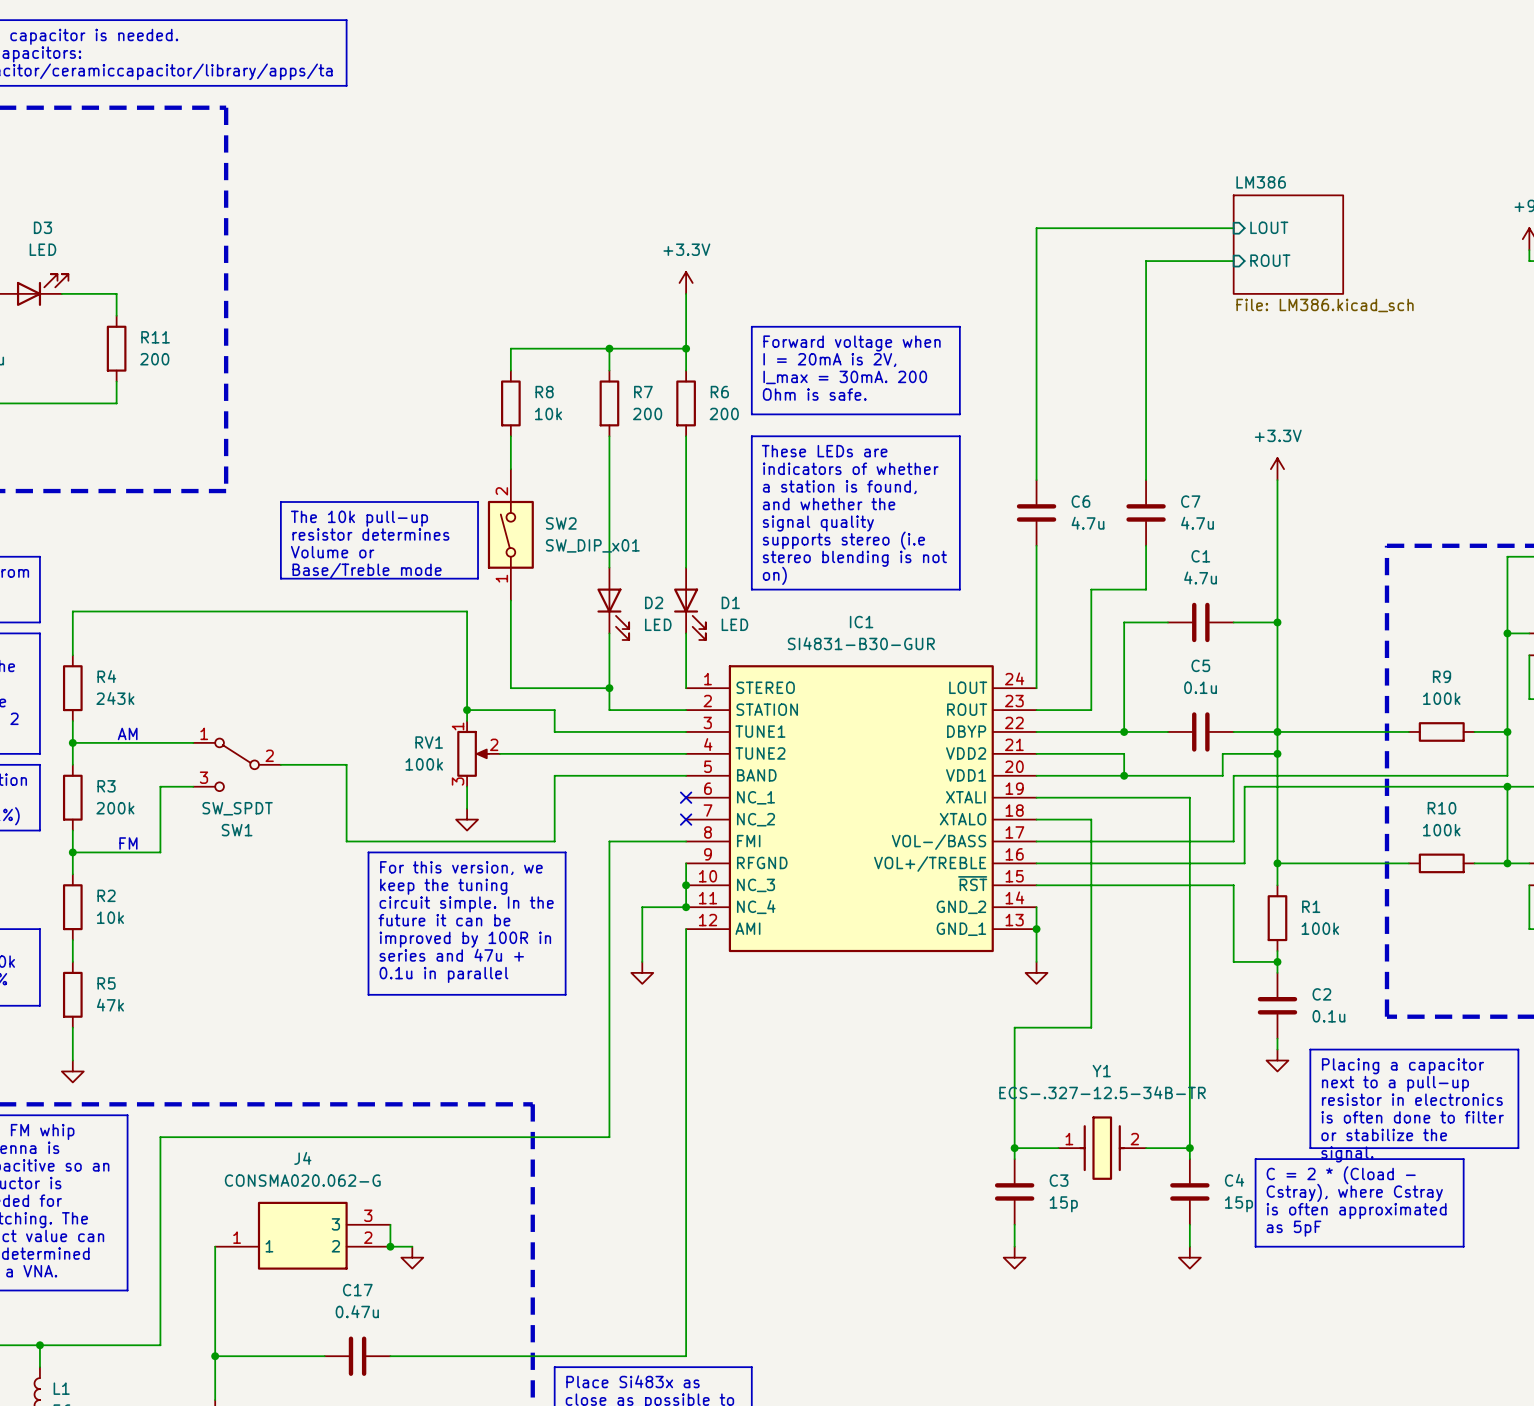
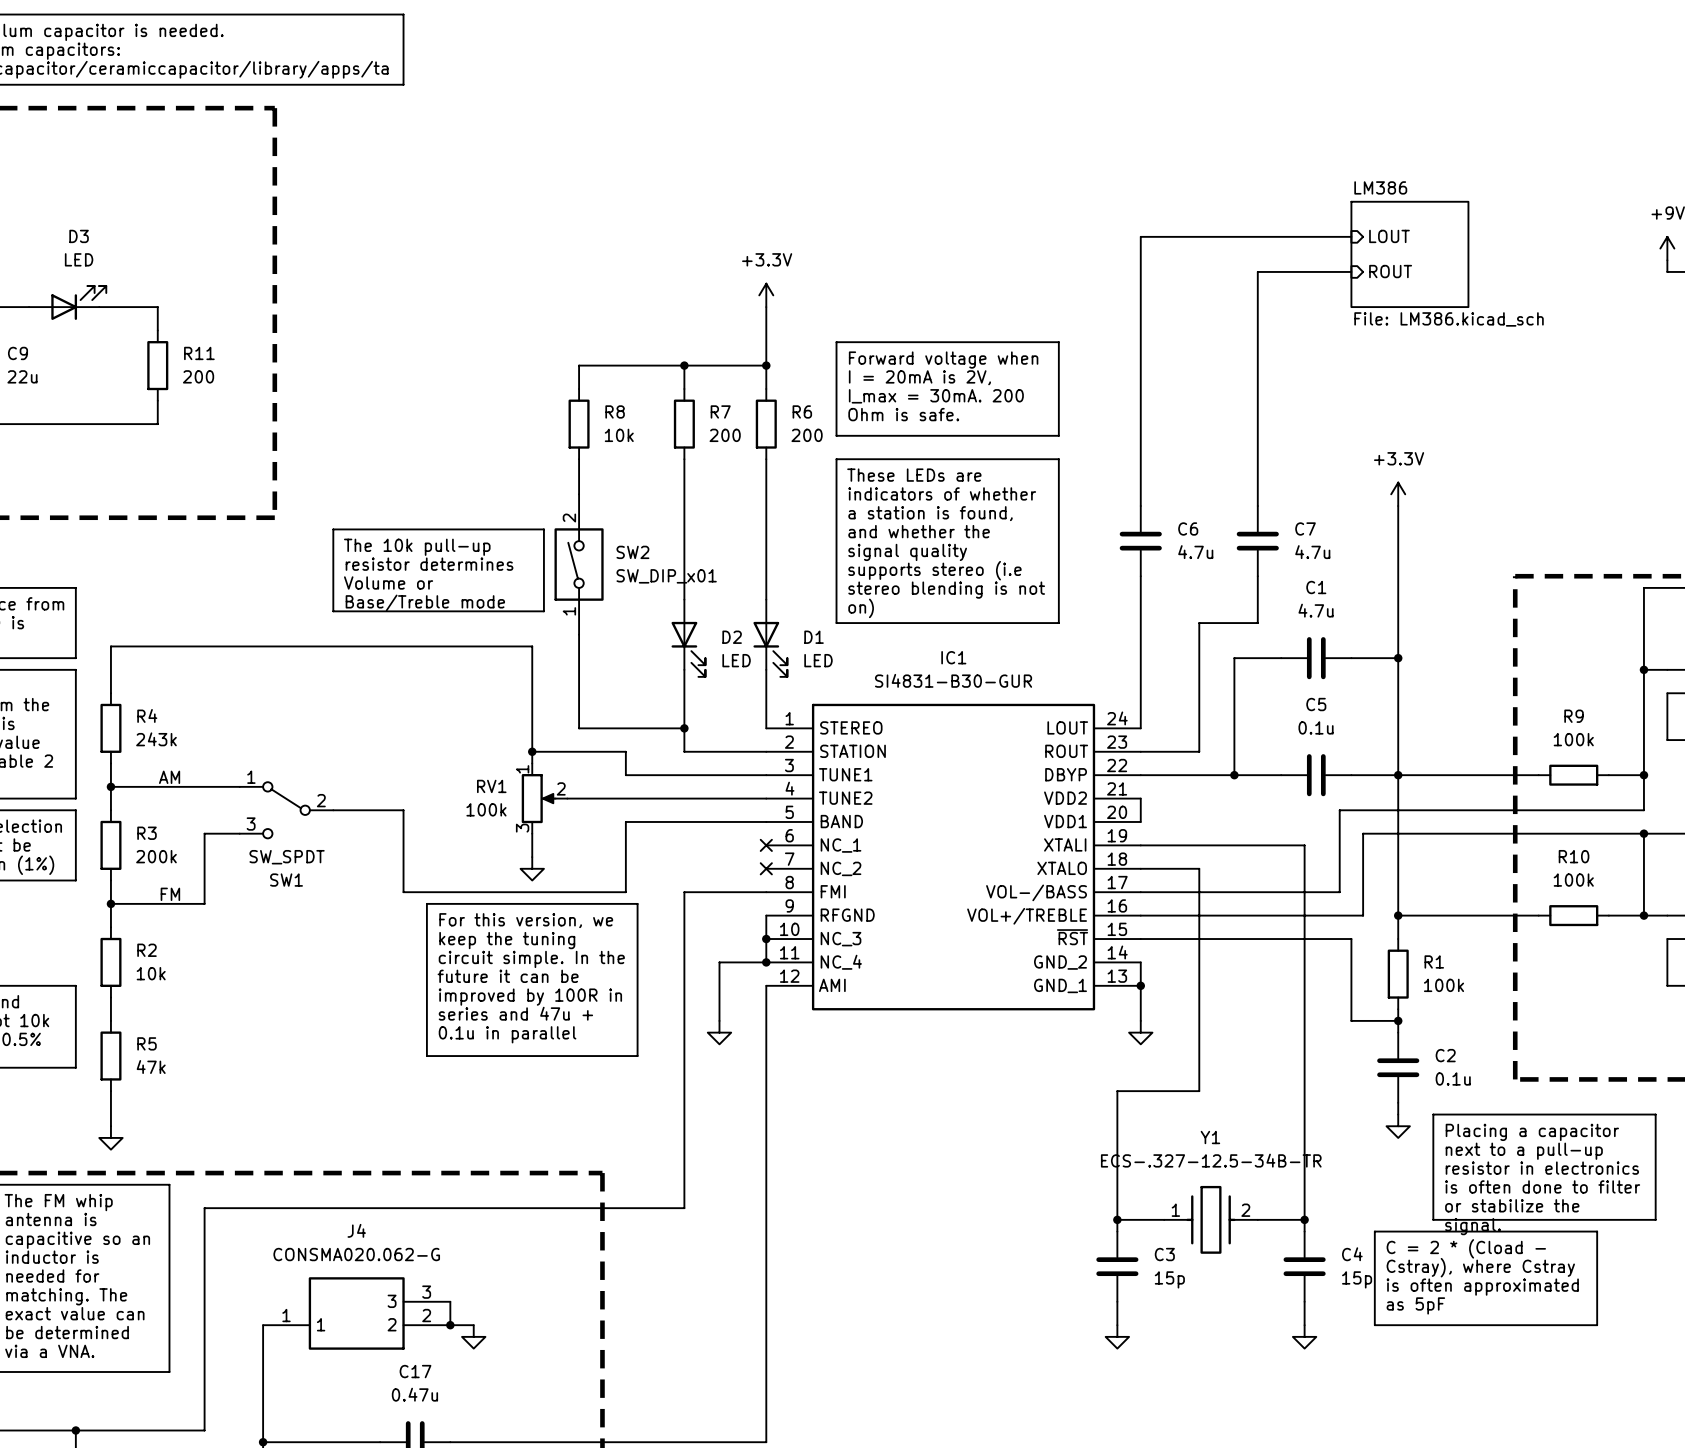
wire: (1036, 753) (1124, 753) (1124, 775) -> (1140, 798) (1140, 821)
wire: (1277, 753) (1222, 753) (1222, 764) -> none
junction: (1277, 753) -> none
wire: (1507, 764) (1507, 775) (1233, 775) (1233, 841) (1222, 841) -> (1643, 810) (1339, 810)
wire: (1036, 775) (1222, 775) -> (1339, 892) (1339, 821)
junction: (1124, 775) -> none

